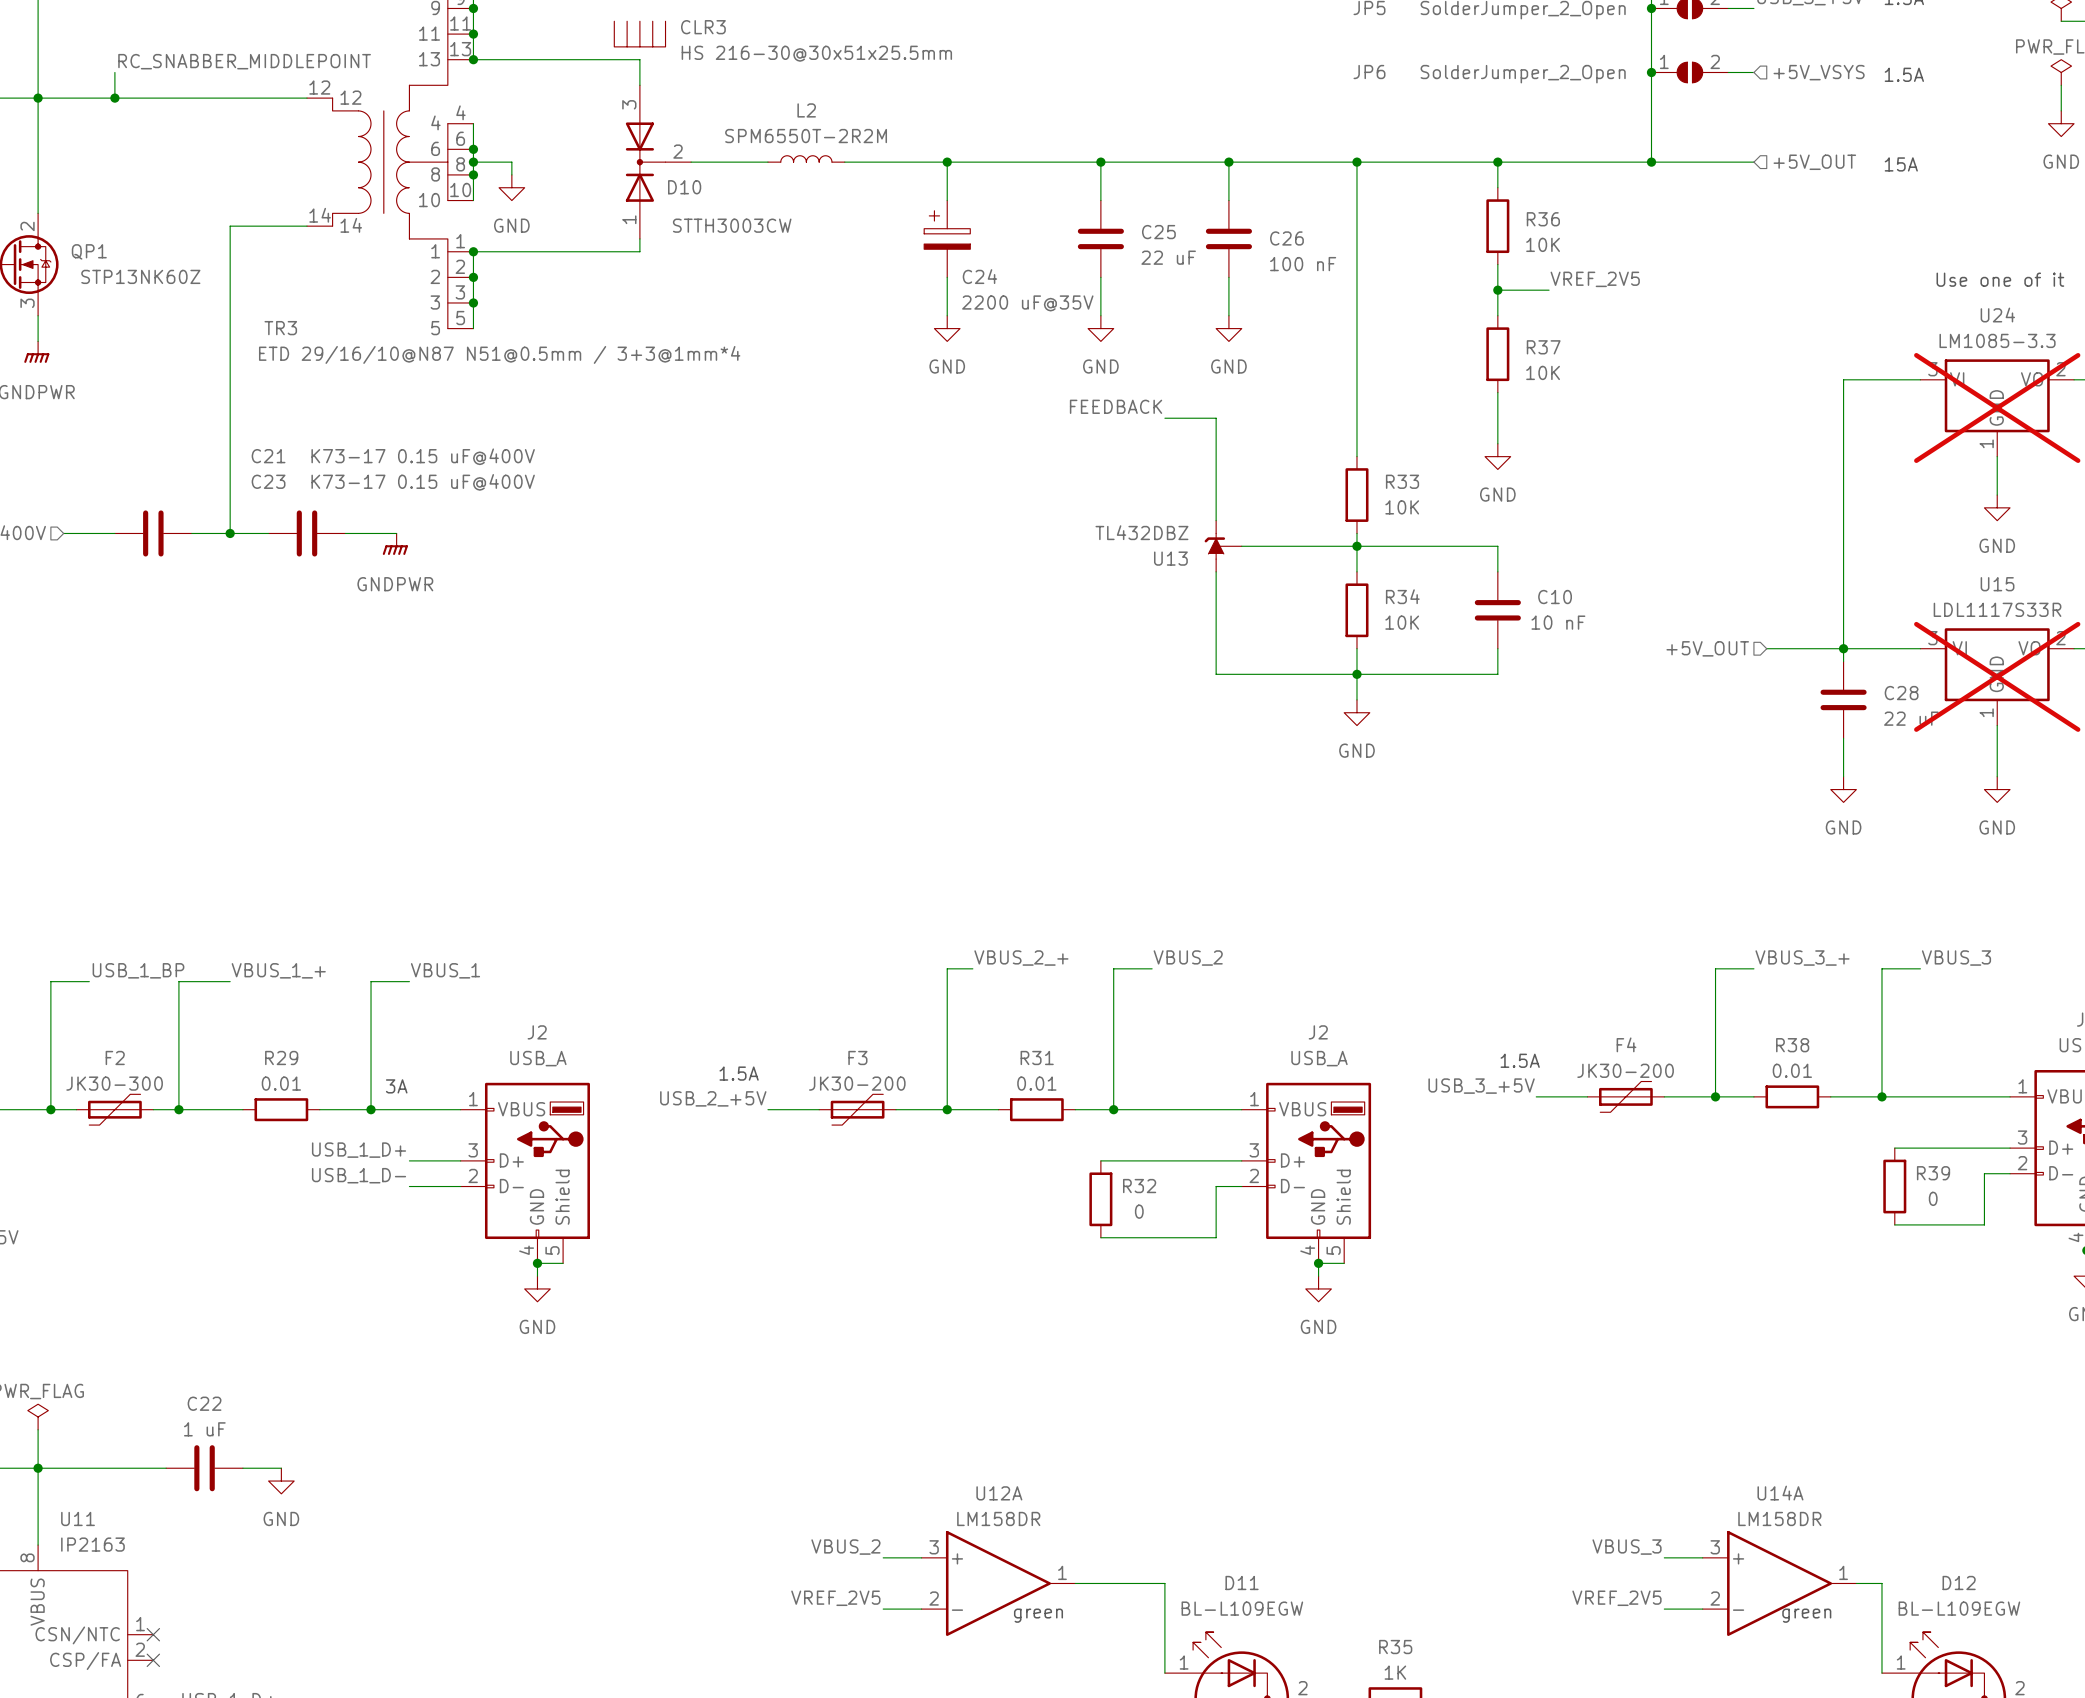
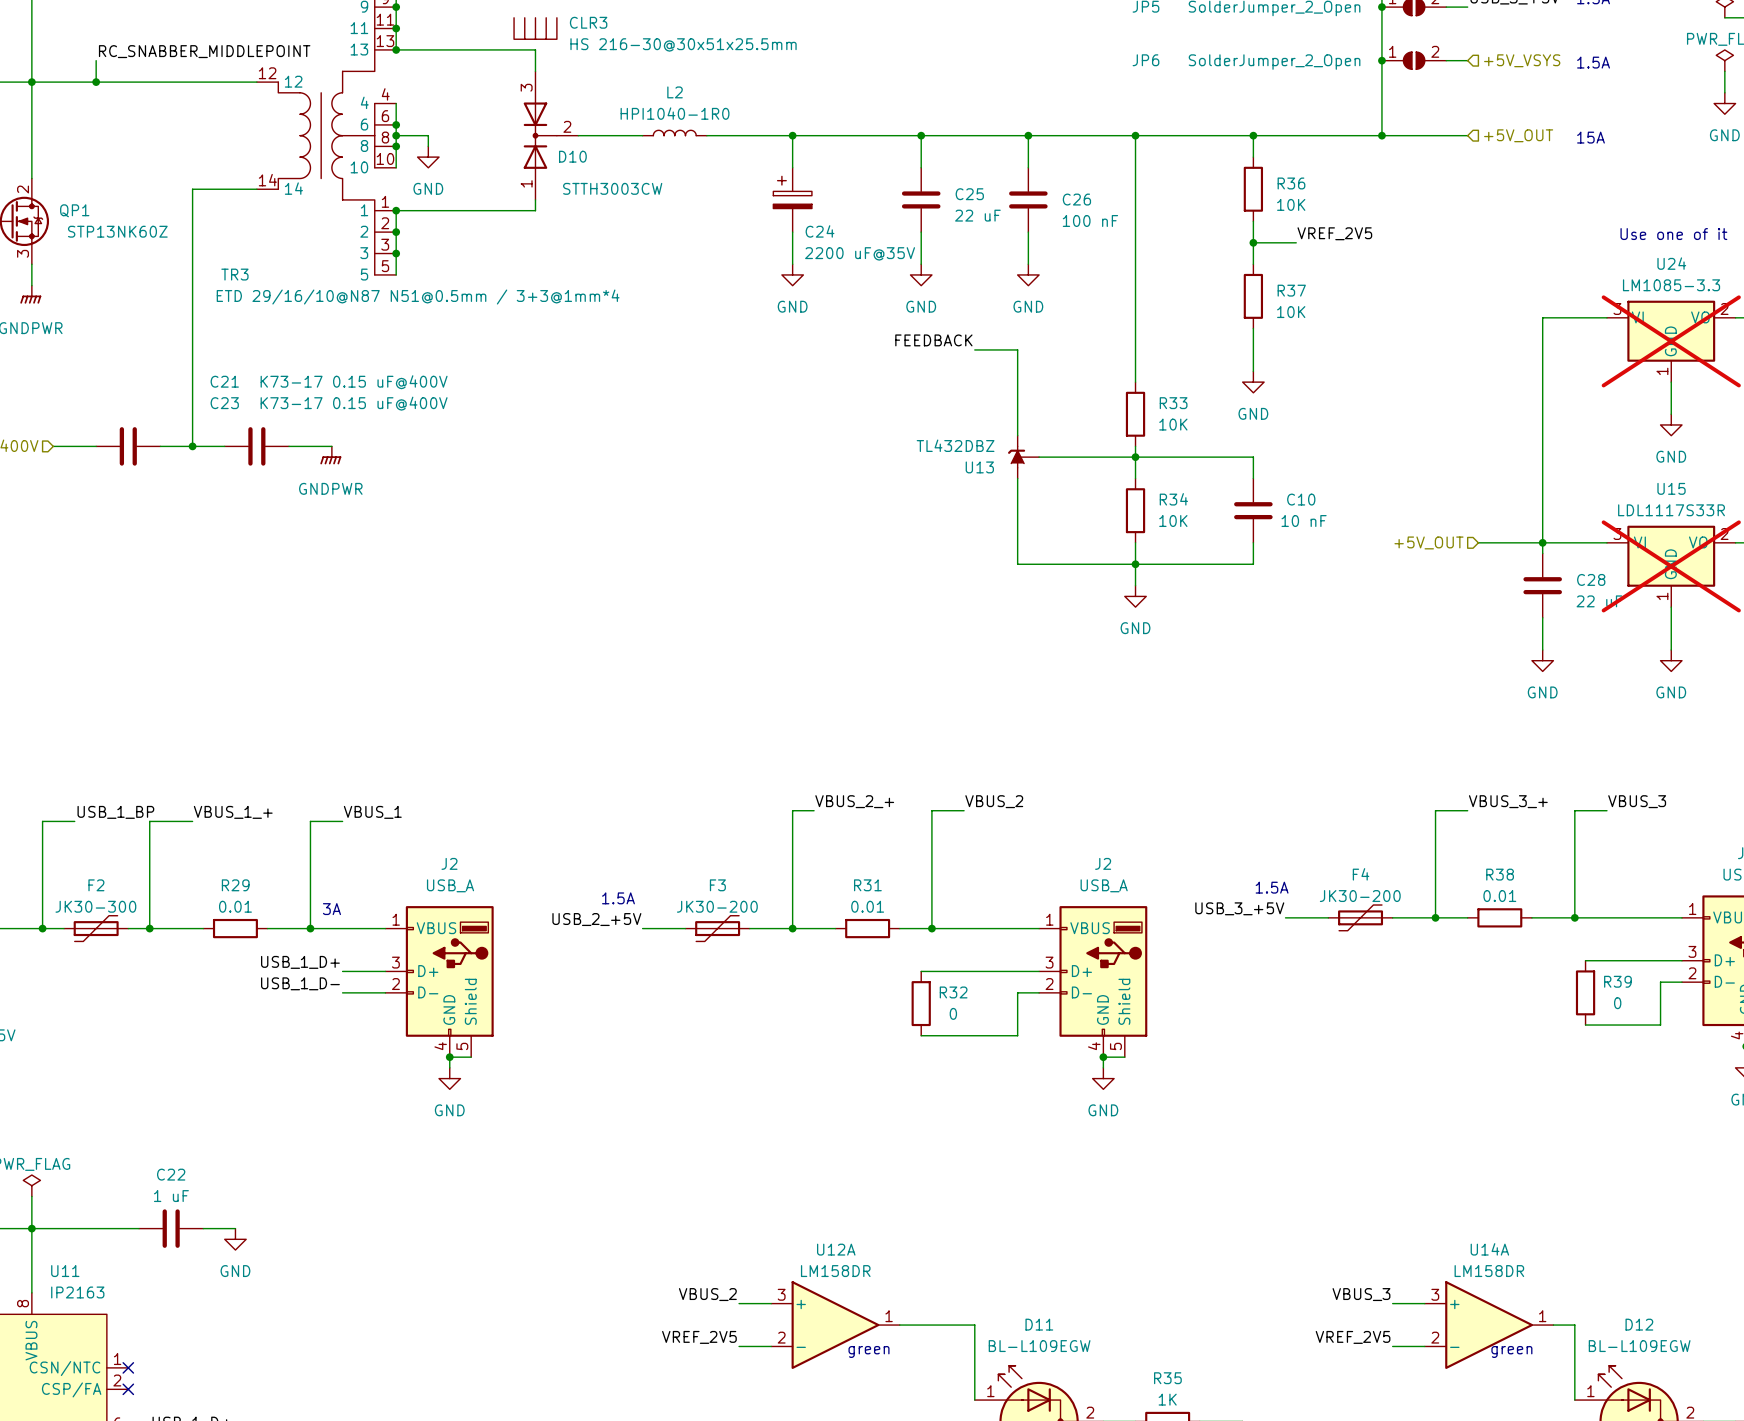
L2 value: SPM6550T-2R2M (806, 136) -> HPI1040-1R0 (675, 113)

